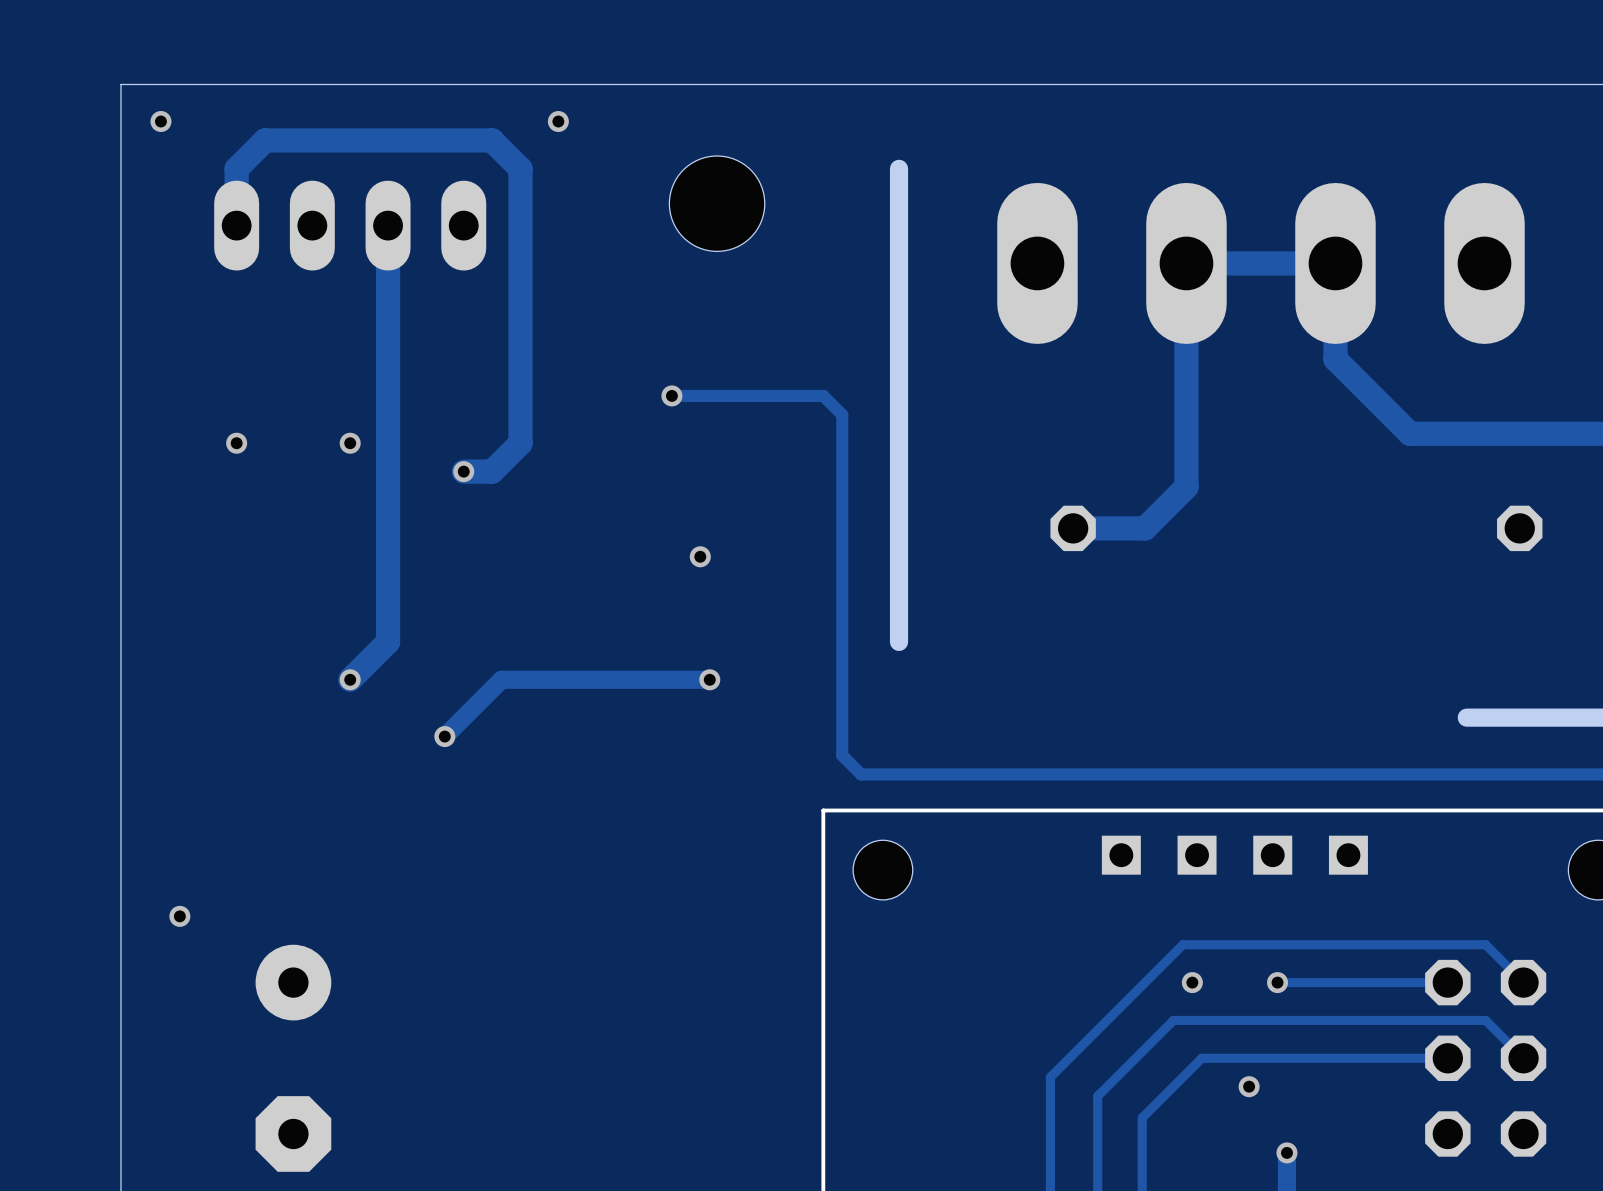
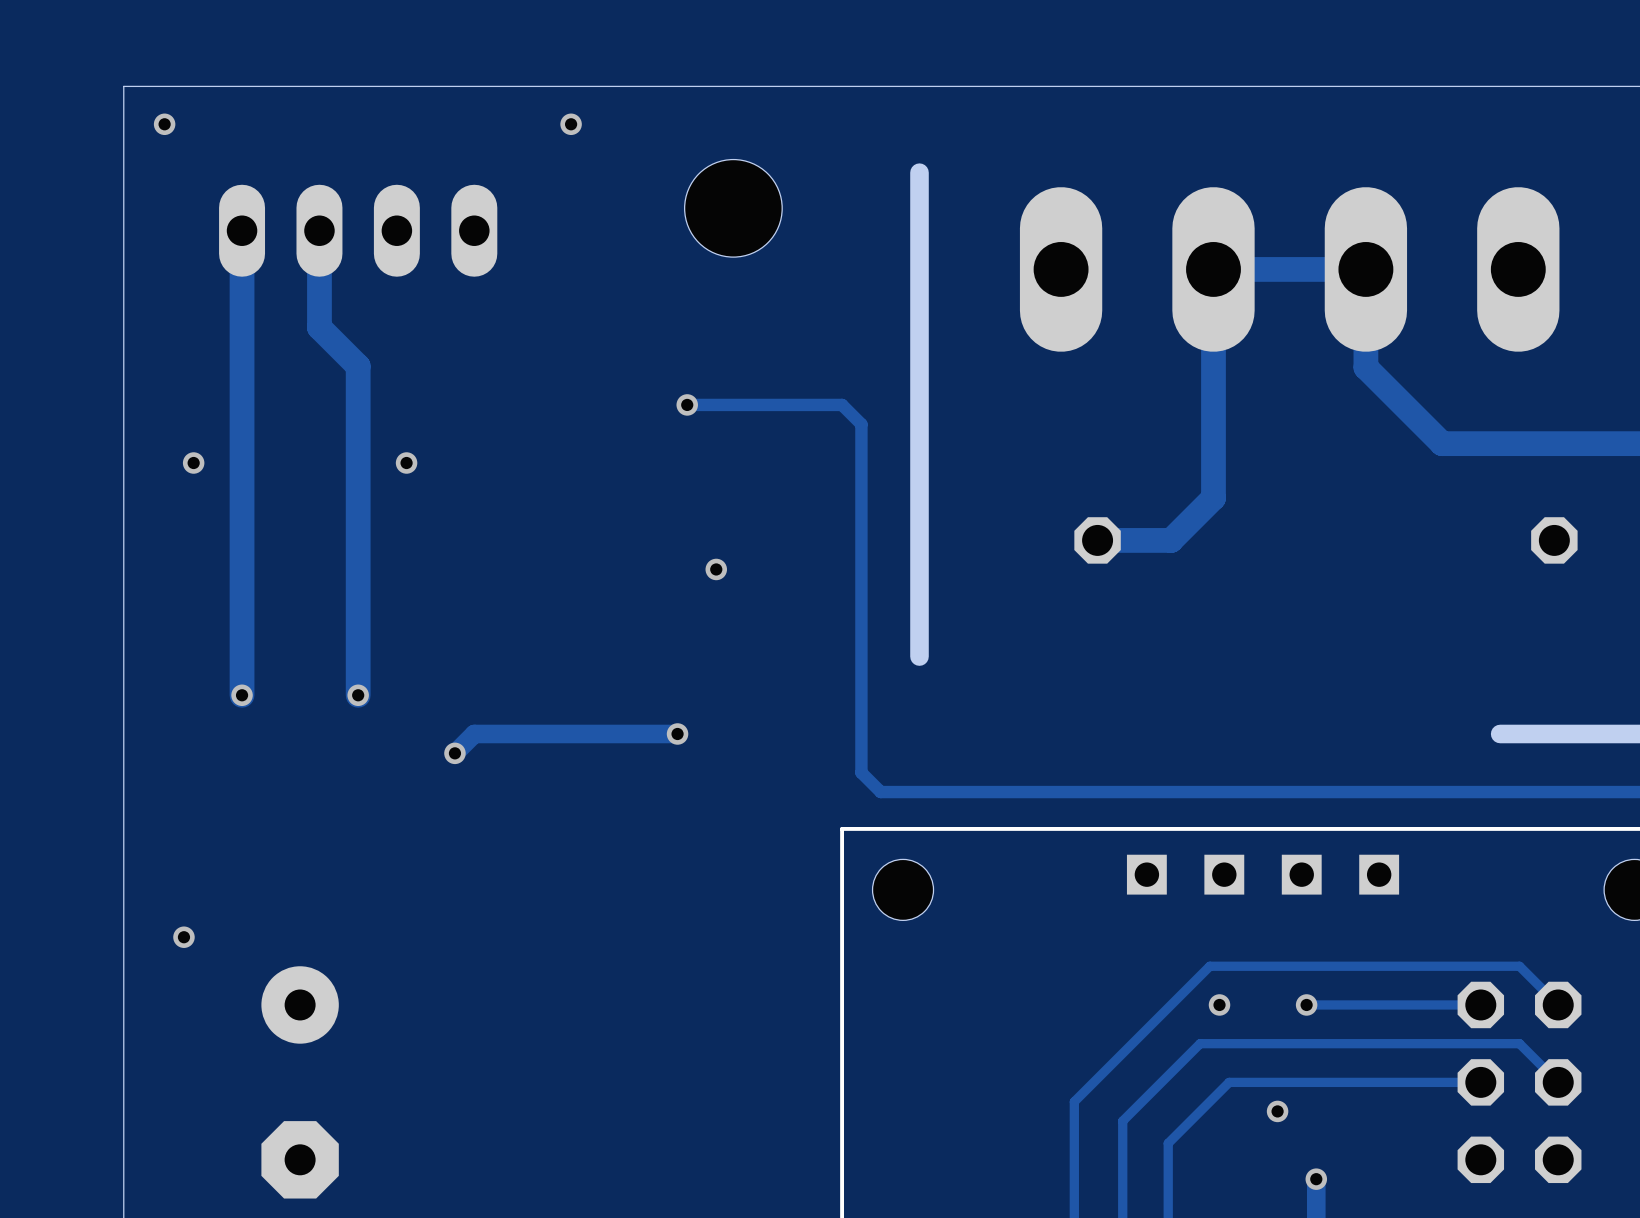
track: (236, 225) (236, 168) (265, 140) (492, 140) (520, 168) (520, 443) (492, 471) (463, 471) -> (242, 230) (242, 695)
track: (388, 225) (388, 641) (350, 679) -> (319, 230) (319, 327) (358, 366) (358, 695)
via position: (236, 443) -> (193, 463)
via: (350, 443) -> none
via: none -> (406, 463)
via: (463, 471) -> none
via: none -> (242, 695)
track: (709, 679) (501, 679) (463, 717) -> (677, 733) (474, 733)
via position: (709, 679) -> (677, 733)

